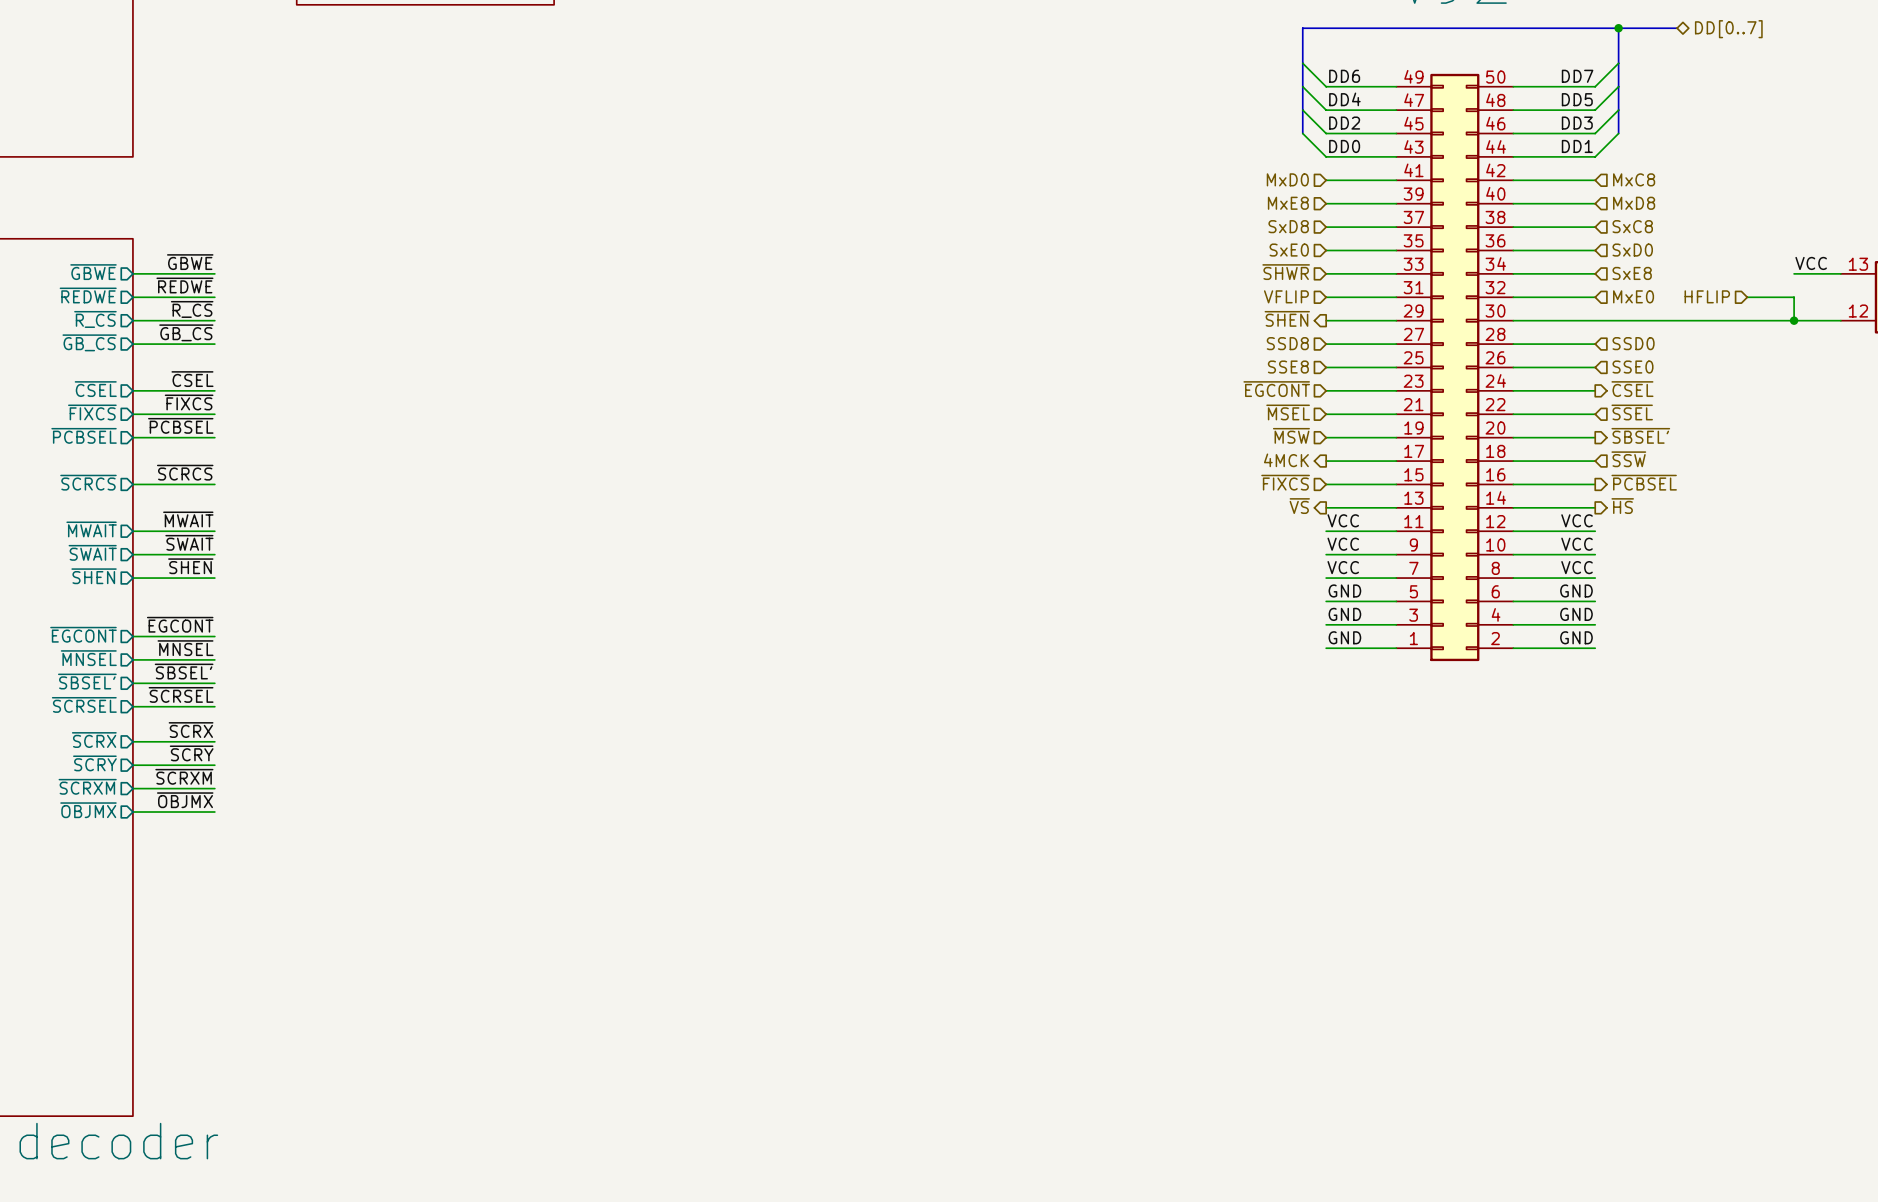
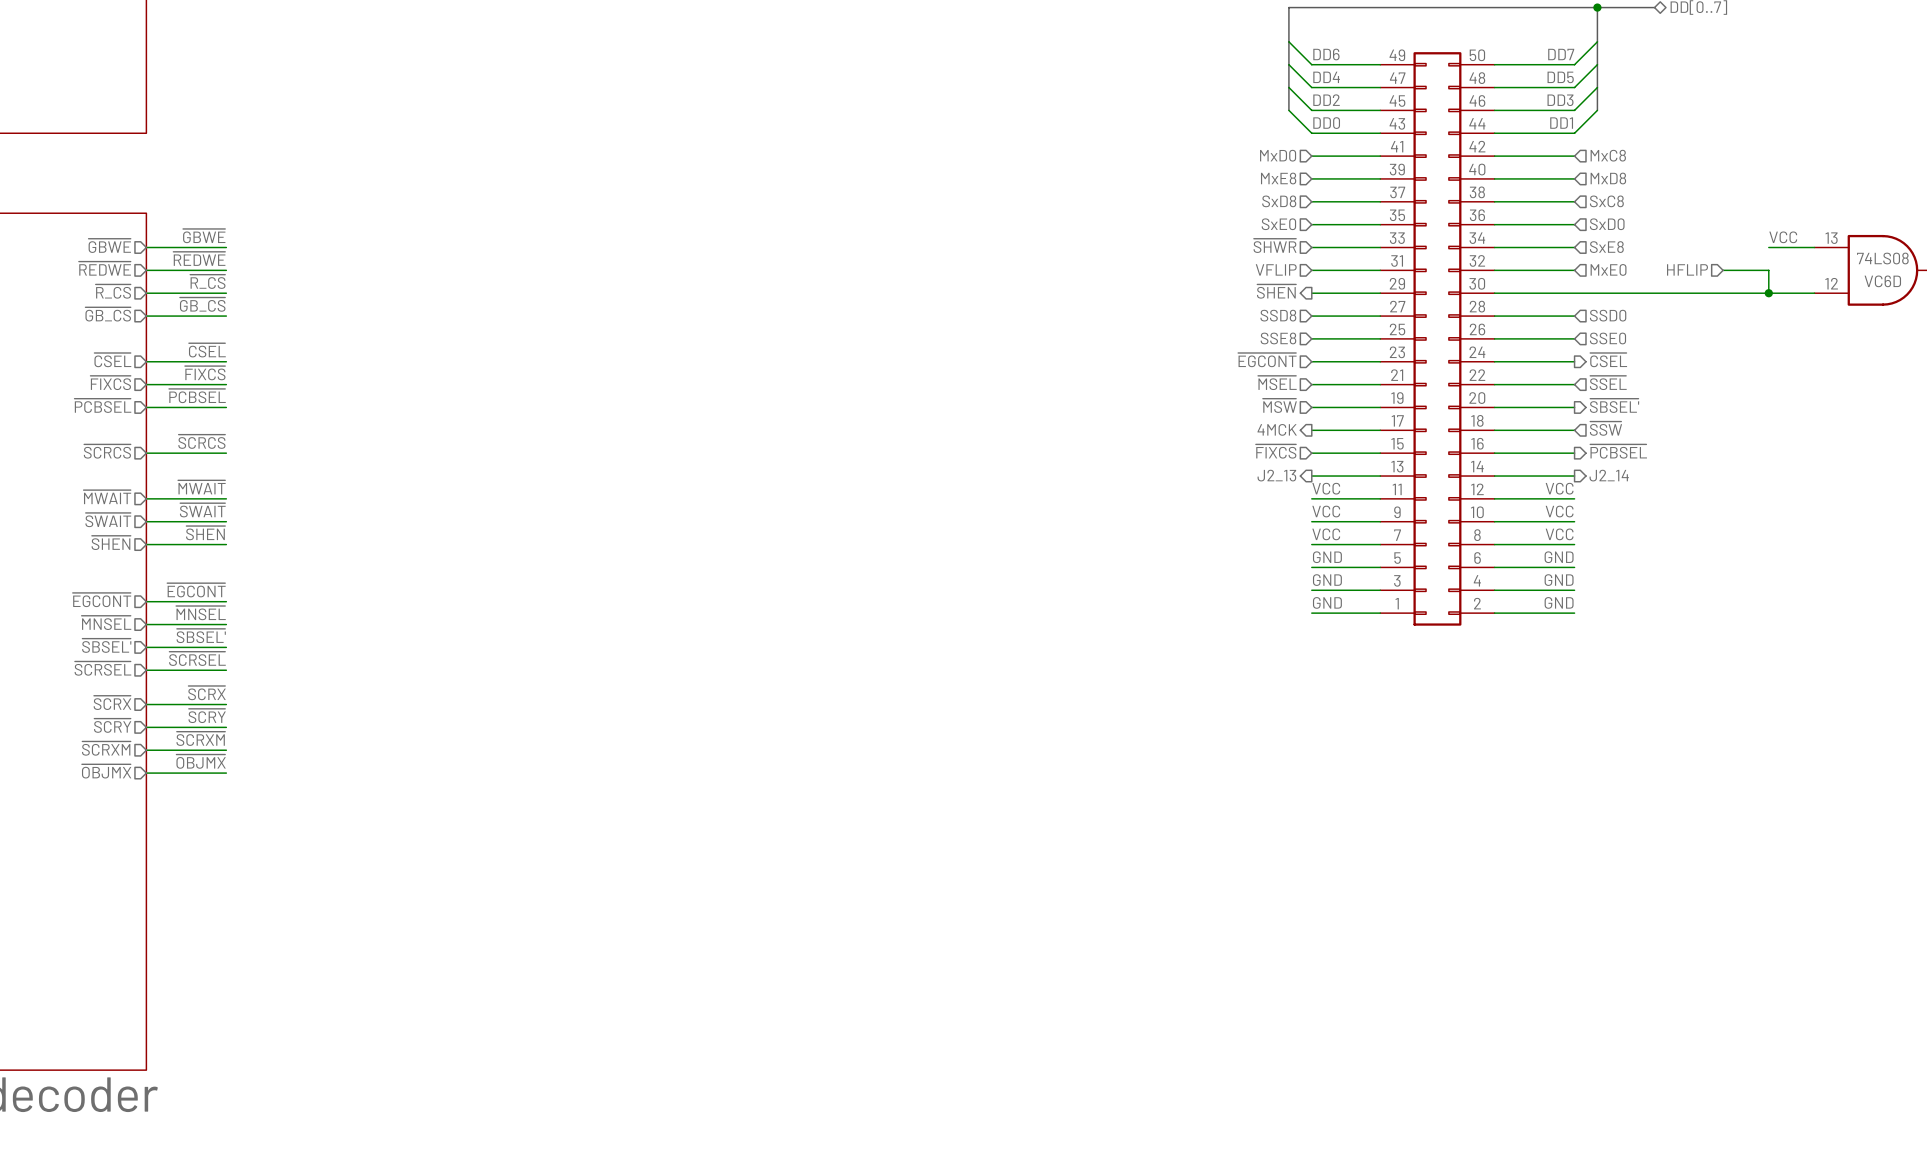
hierarchical label: ~{VS} (1299, 506) -> J2_13 (1276, 475)
hierarchical label: ~{HS} (1622, 506) -> J2_14 (1609, 475)

